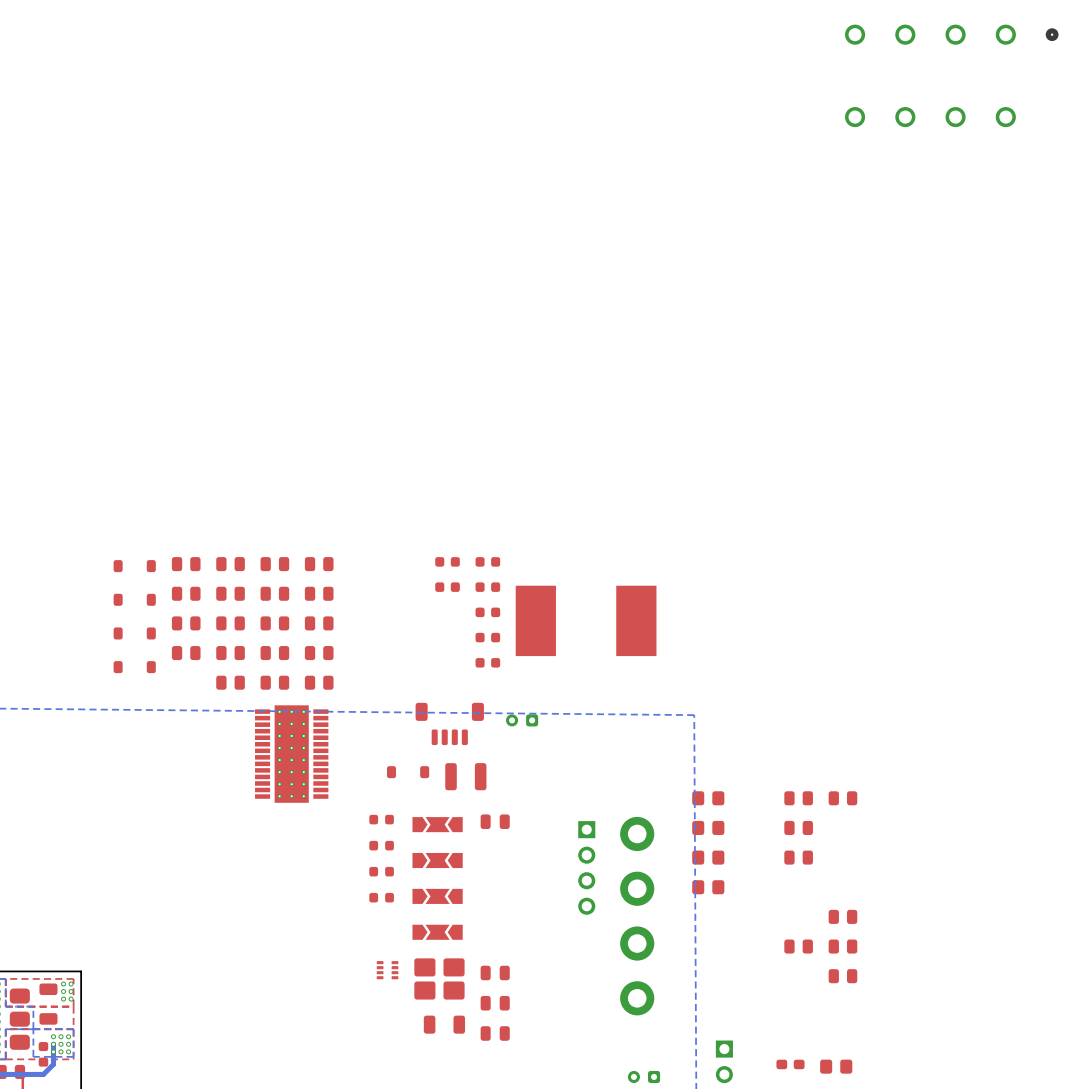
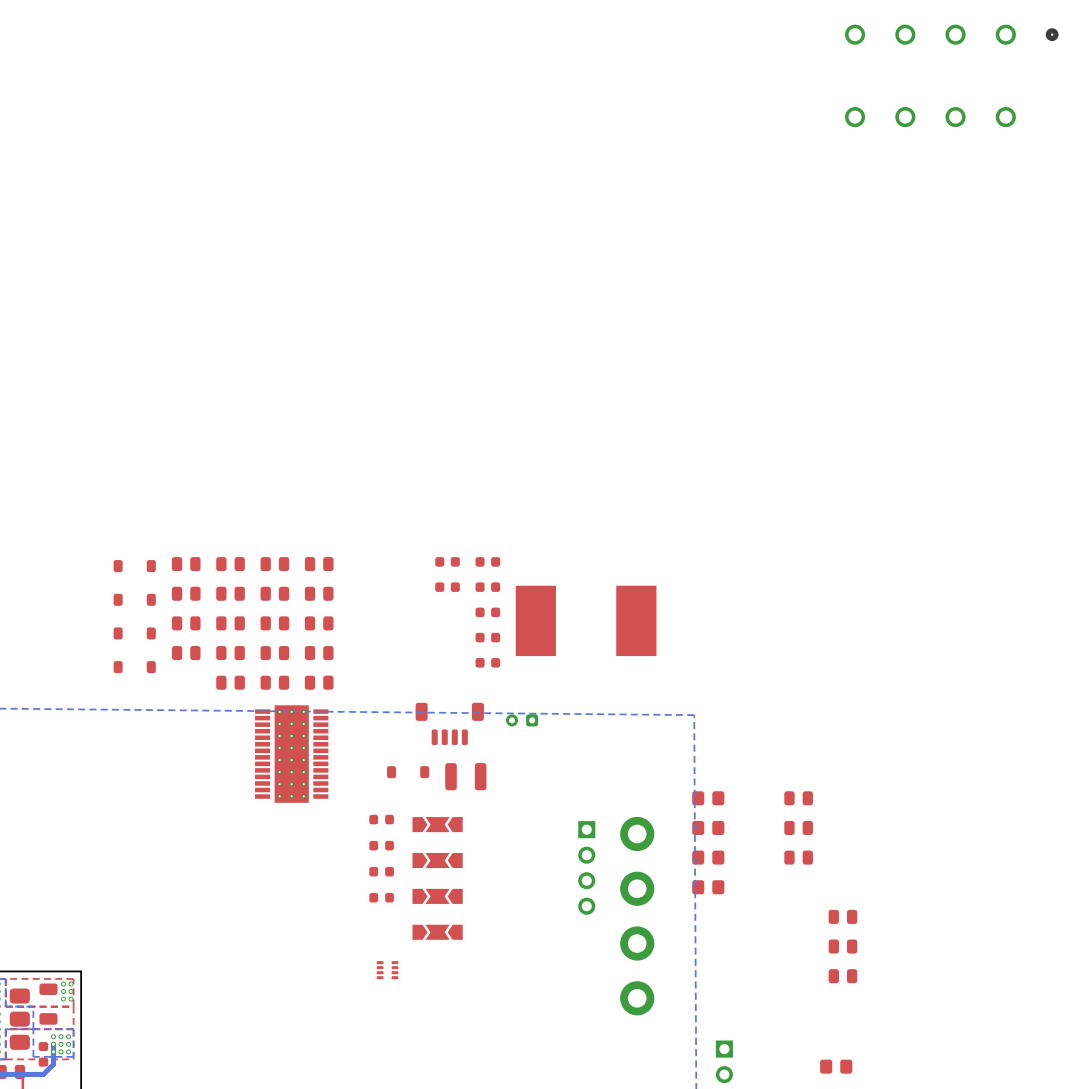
part: (842, 798) -> none
part: (495, 821) -> none
part: (798, 946) -> none
part: (495, 972) -> none
part: (439, 978) -> none
part: (495, 1003) -> none
part: (444, 1024) -> none
part: (495, 1033) -> none
part: (790, 1064) -> none
part: (643, 1076) -> none

